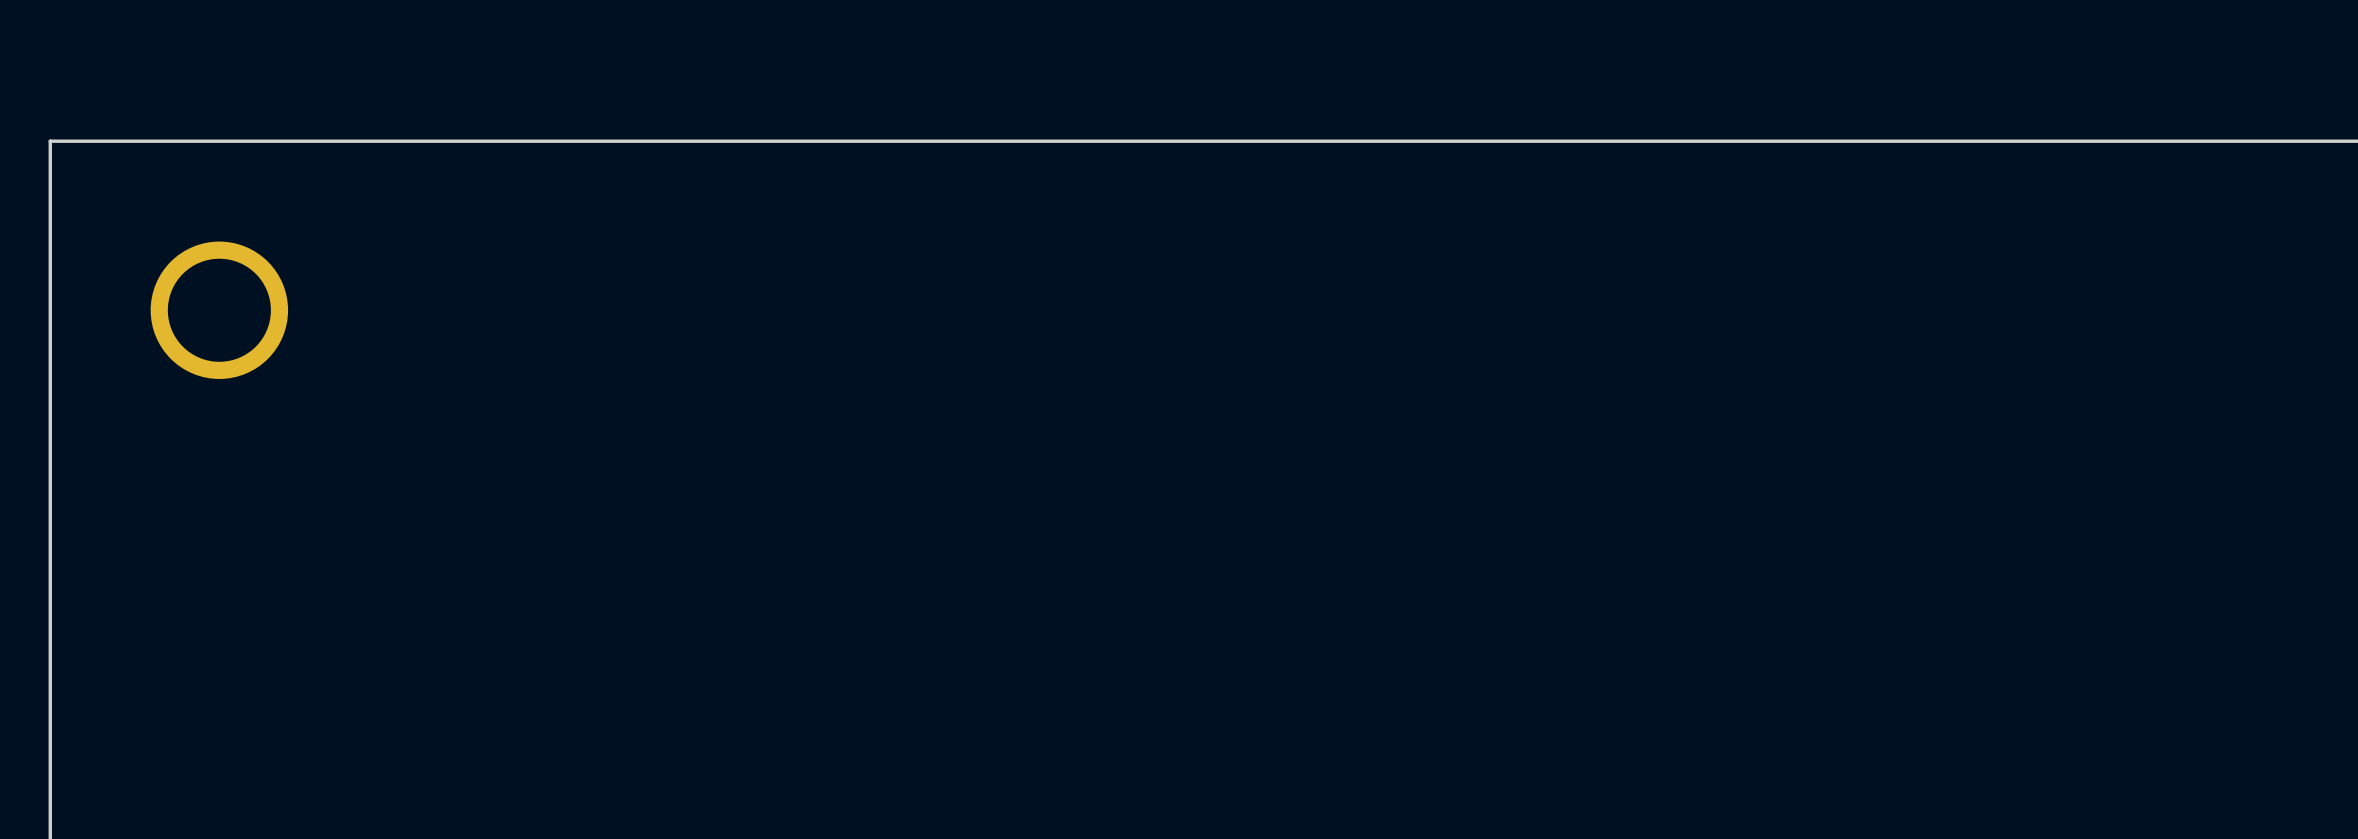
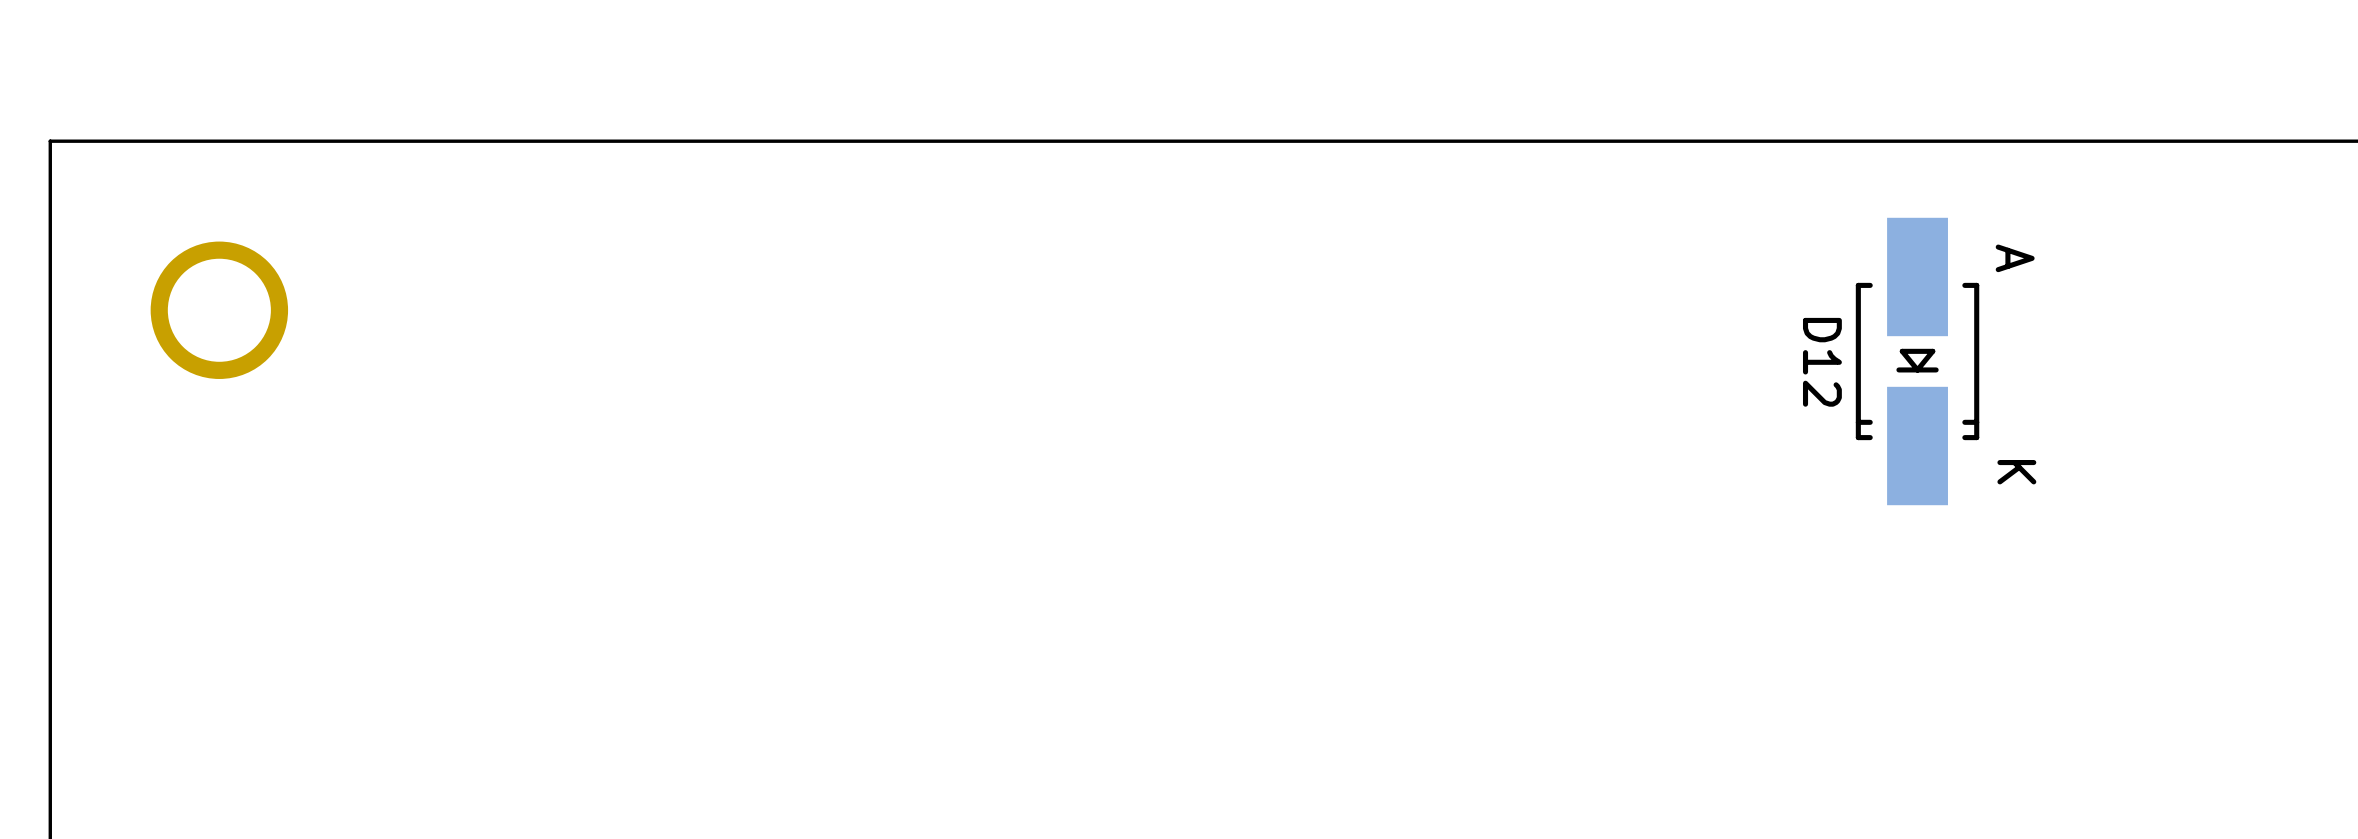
D12: none -> (1917, 361)

